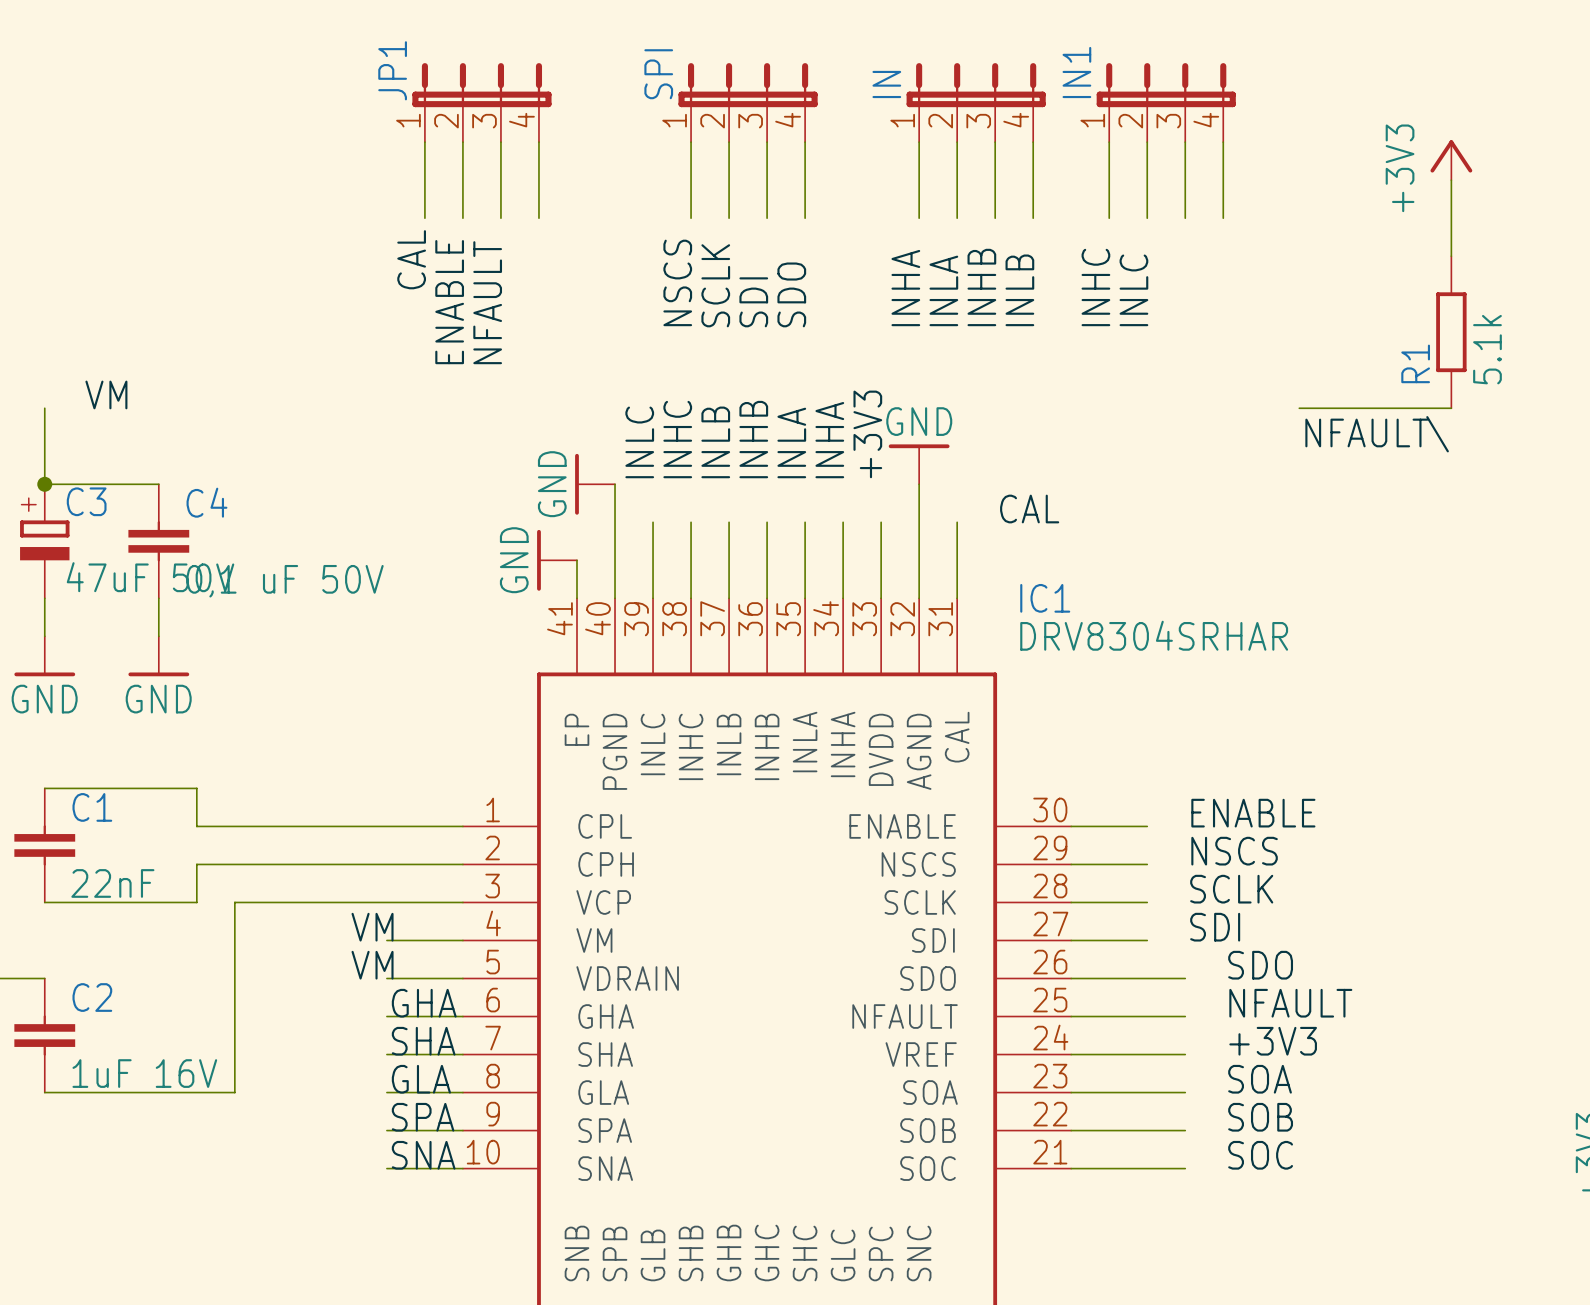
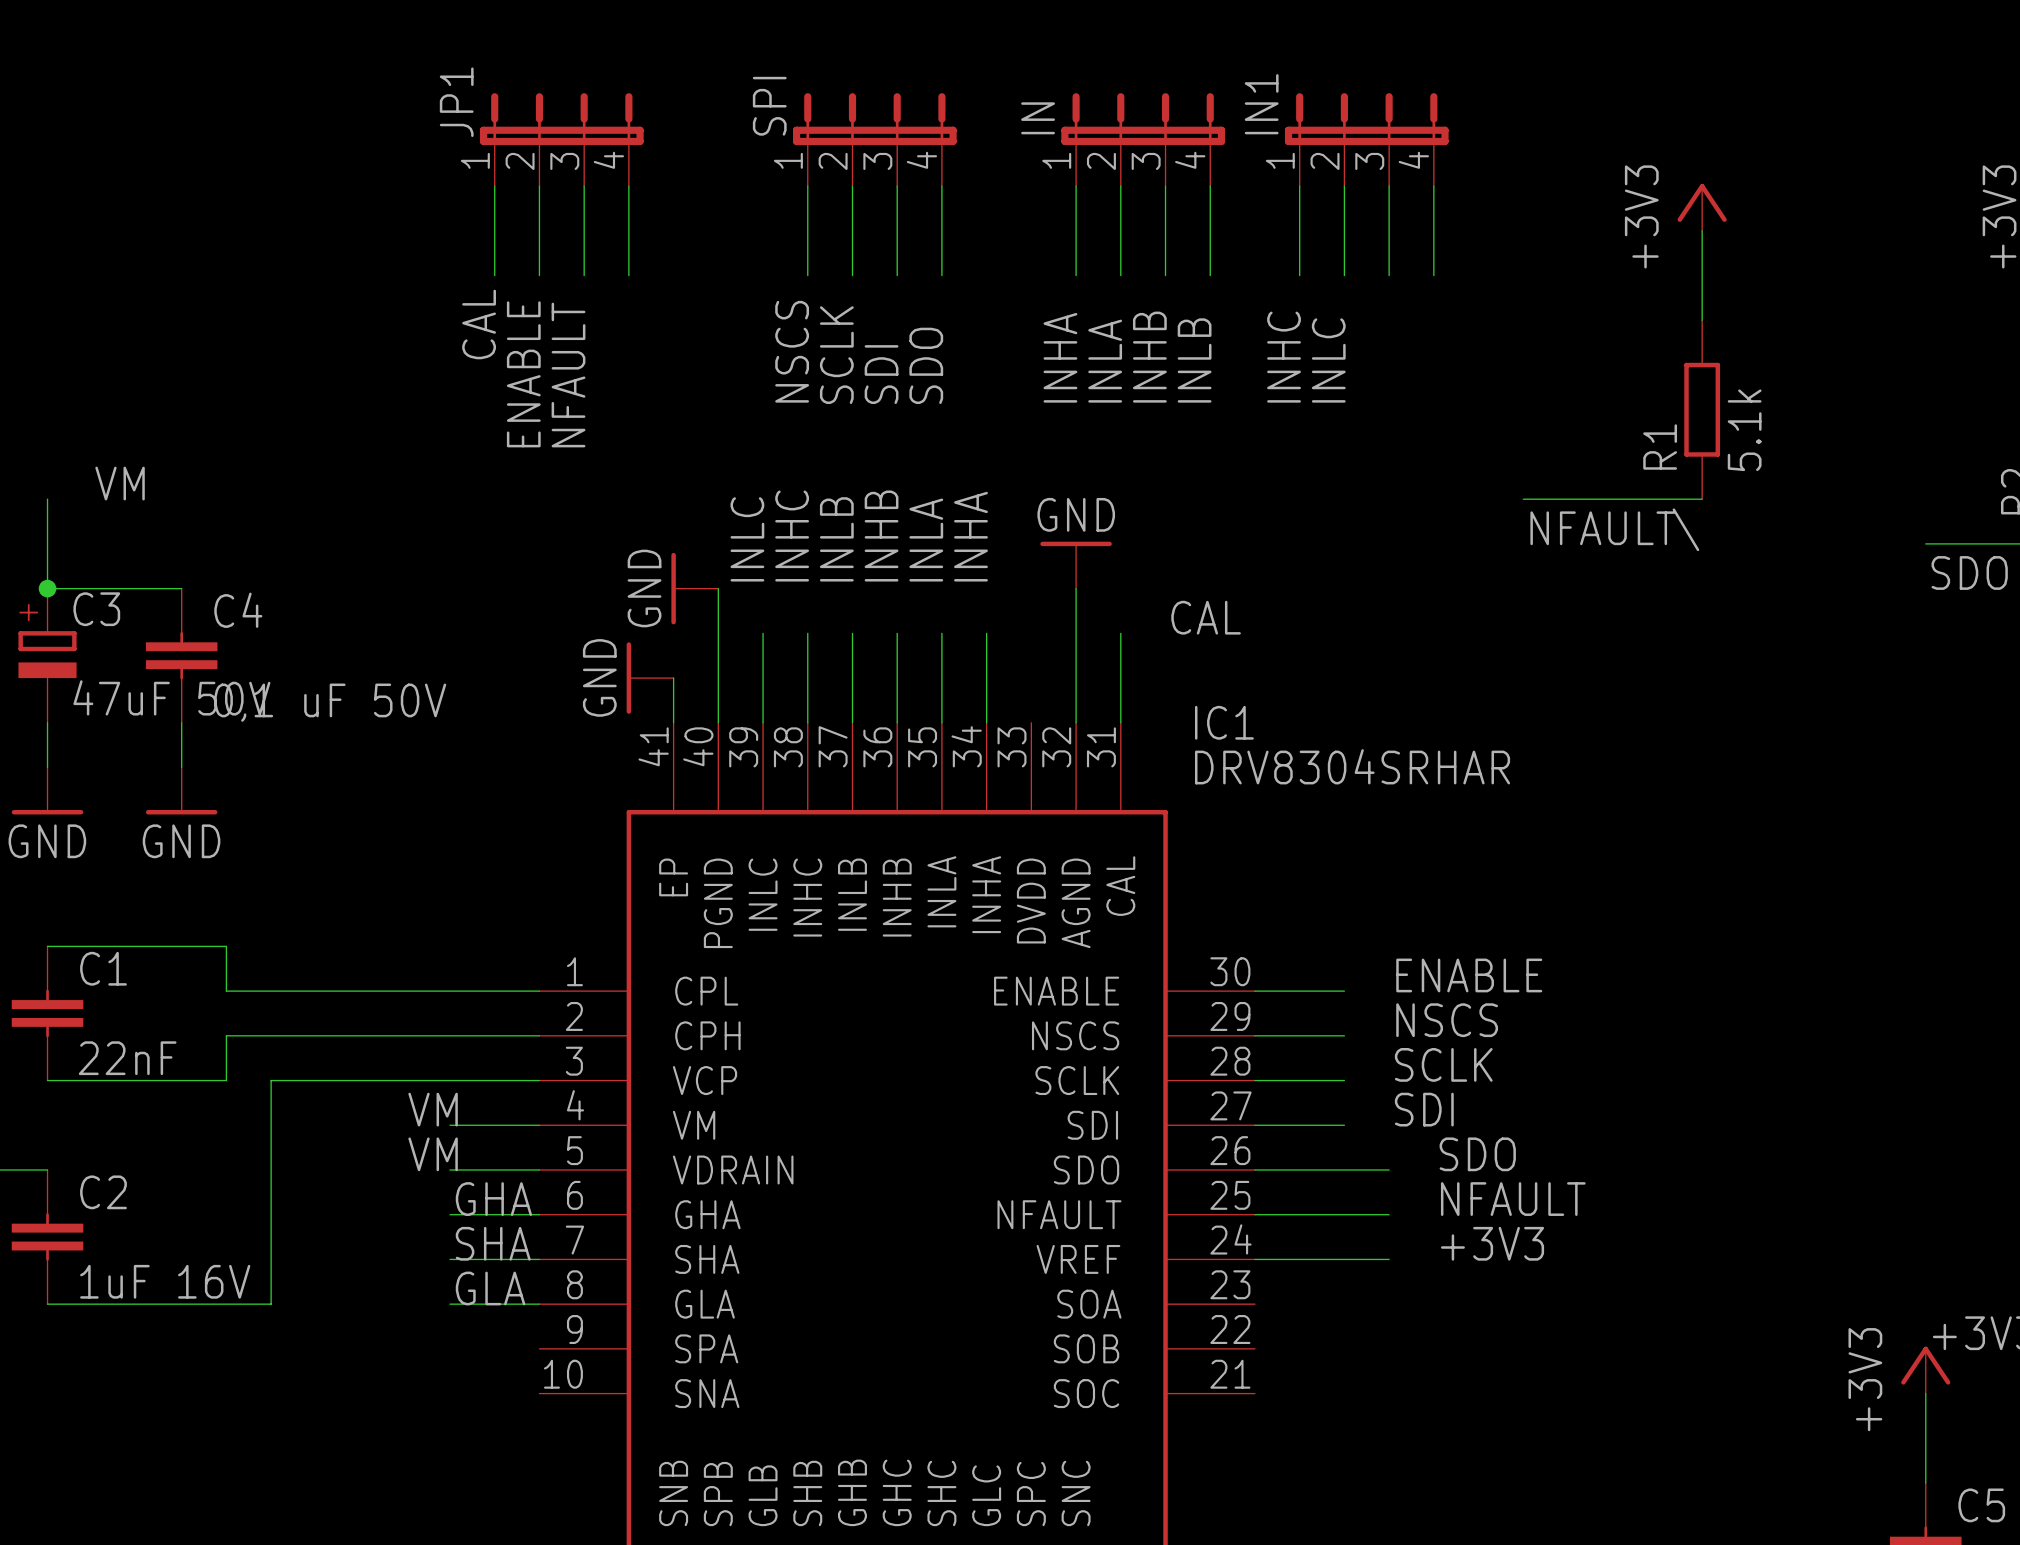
label: +3V3 (867, 434) -> none
wire: (881, 522) (881, 598) -> none
label: SOA (1260, 1079) -> none
wire: (1071, 1092) (1185, 1092) -> none
label: SPA (423, 1117) -> none
label: SOB (1260, 1117) -> none
wire: (386, 1130) (462, 1130) -> none
wire: (1071, 1130) (1185, 1130) -> none
label: SNA (423, 1155) -> none
label: SOC (1260, 1155) -> none
wire: (386, 1168) (462, 1168) -> none
wire: (1071, 1168) (1185, 1168) -> none

